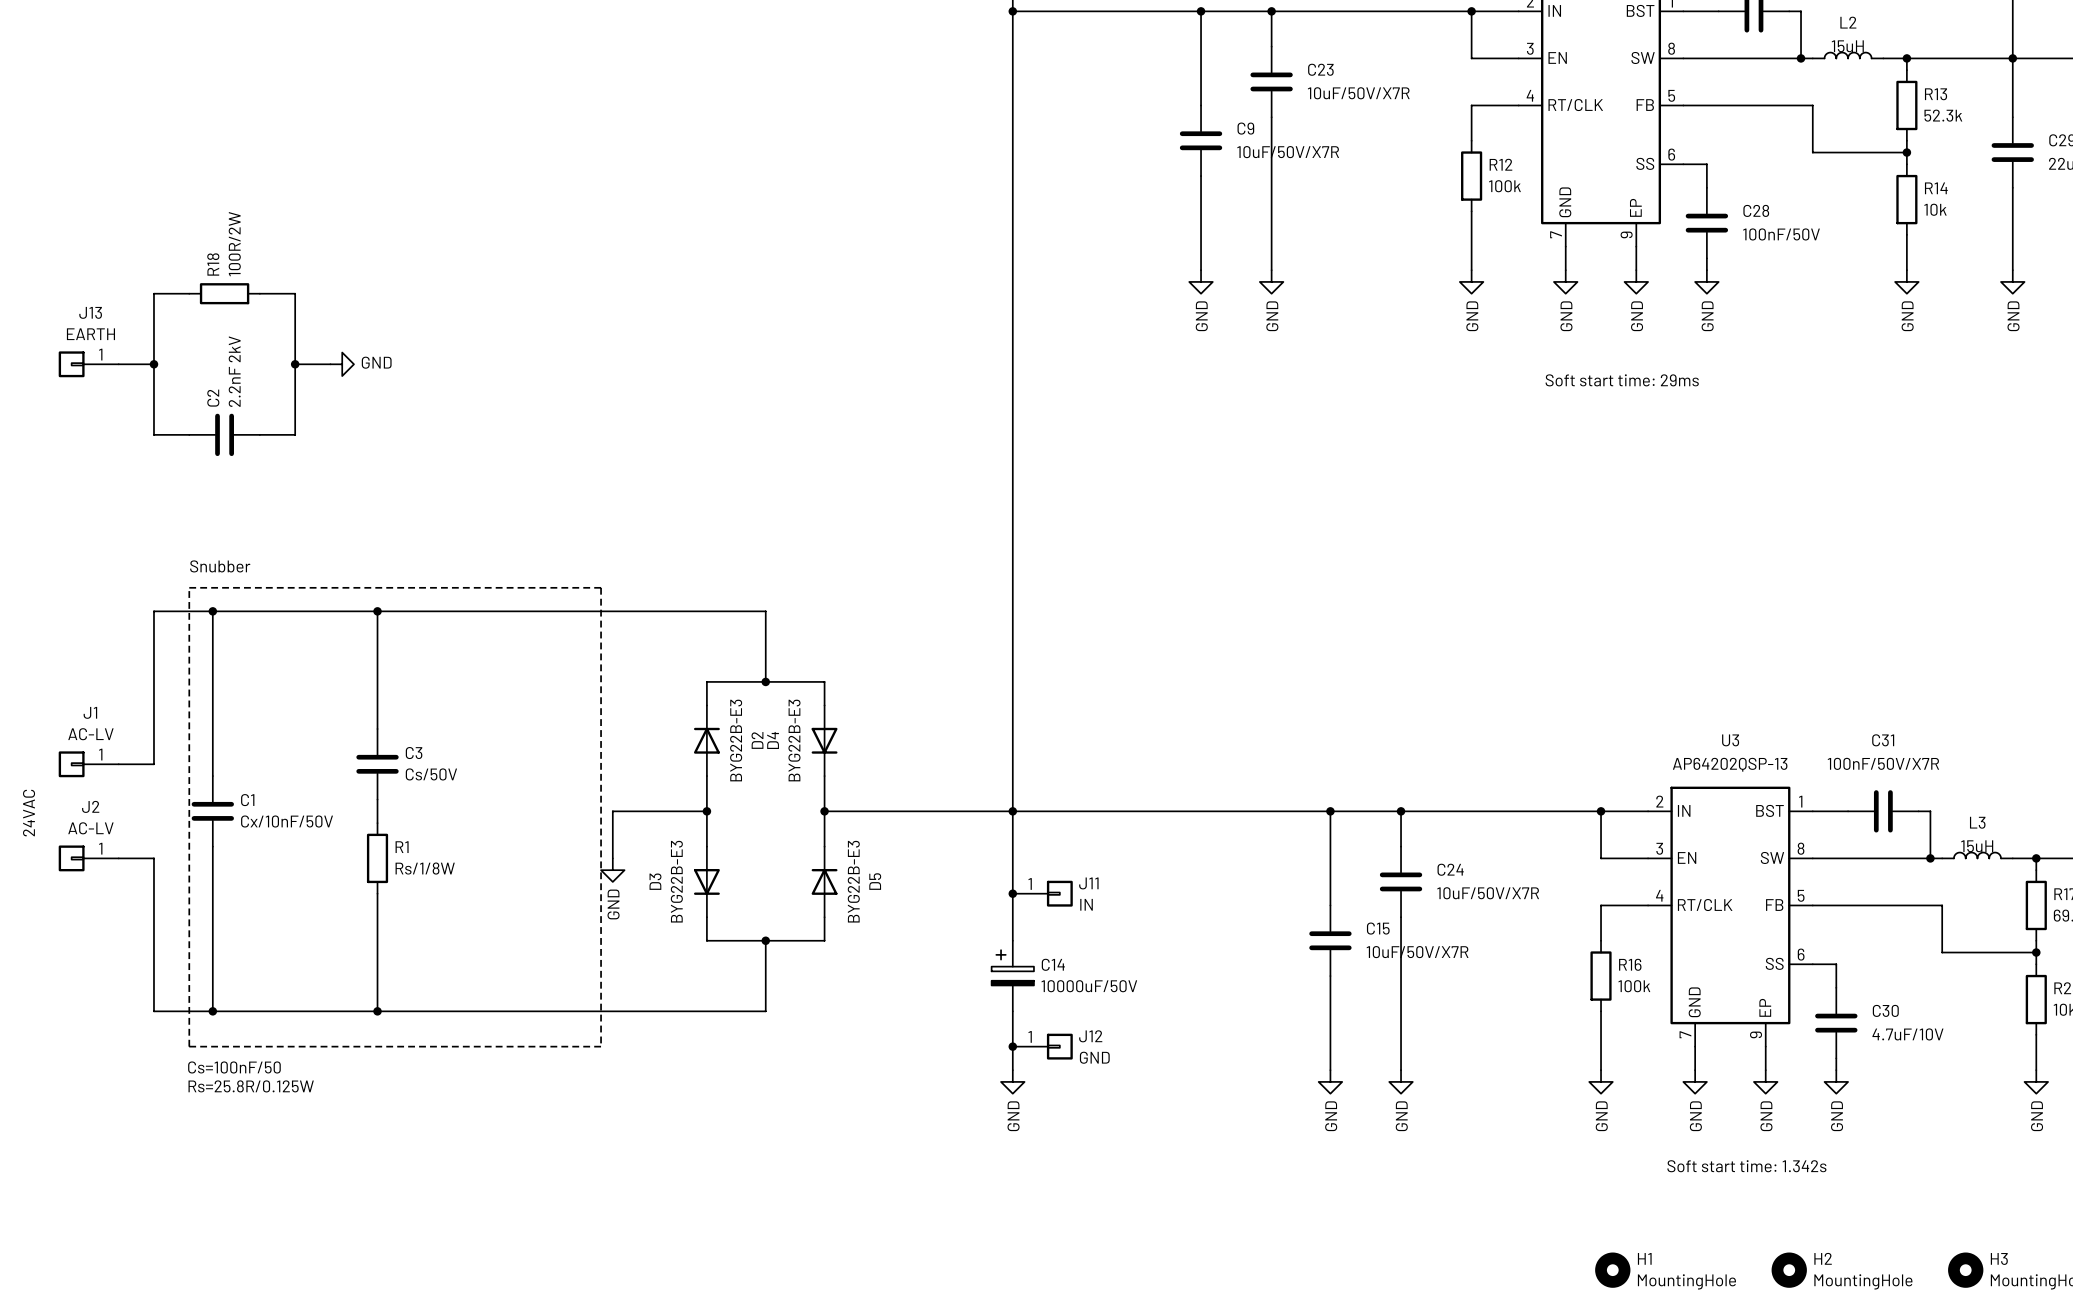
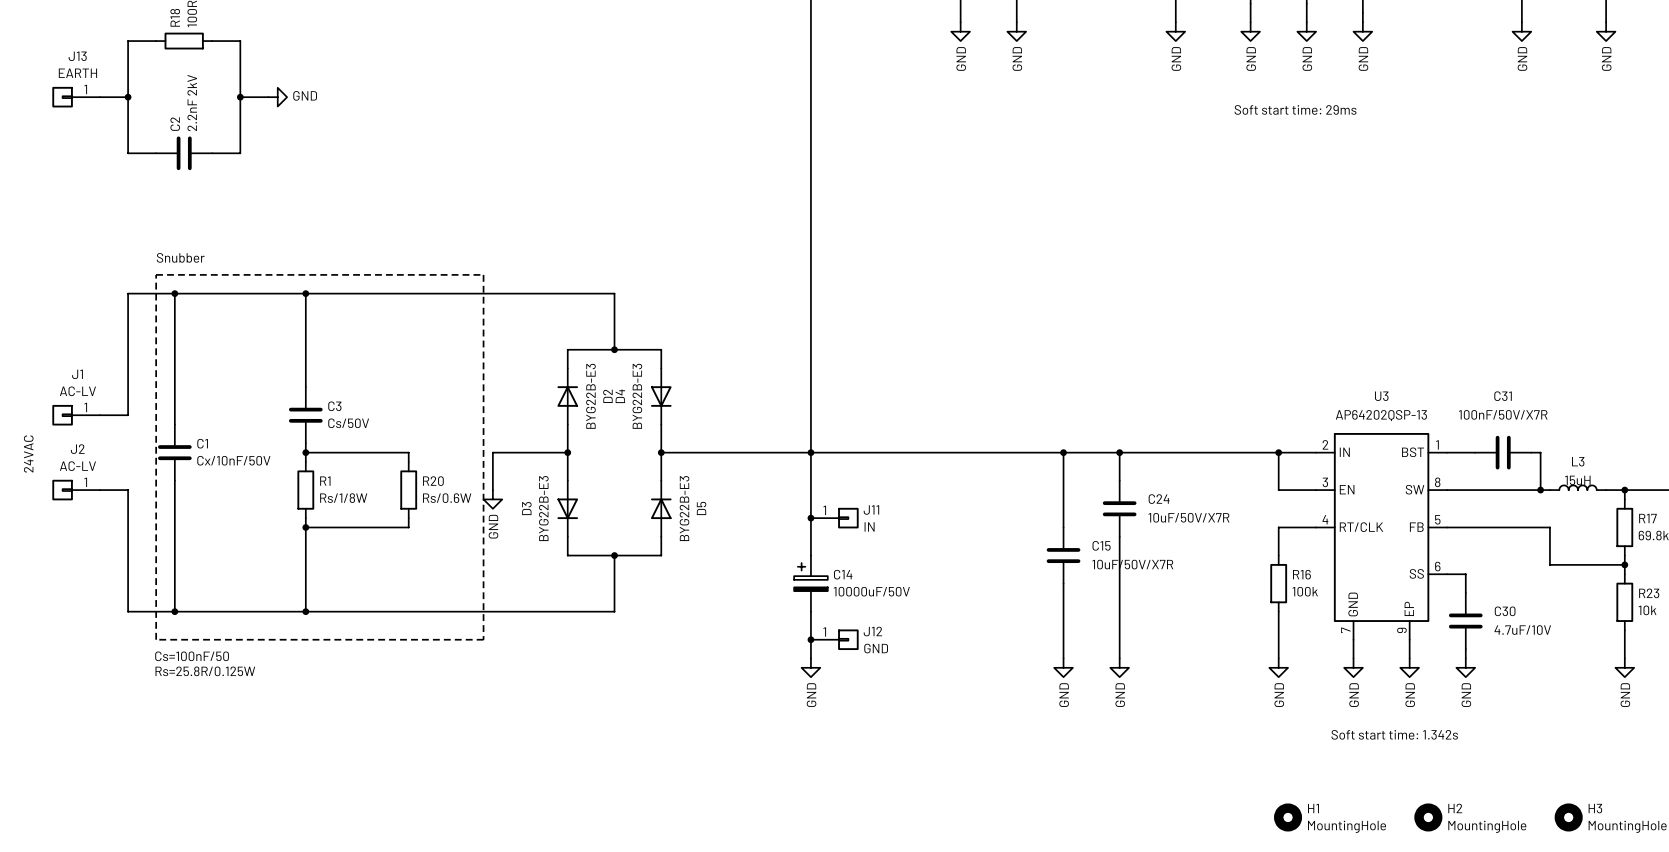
wire: none -> (305, 452) (408, 452) (408, 462)
junction: none -> (305, 452)
R20: none -> Rs/0.6W (408, 490)
wire: none -> (408, 518) (408, 527) (305, 527)
junction: none -> (305, 527)

